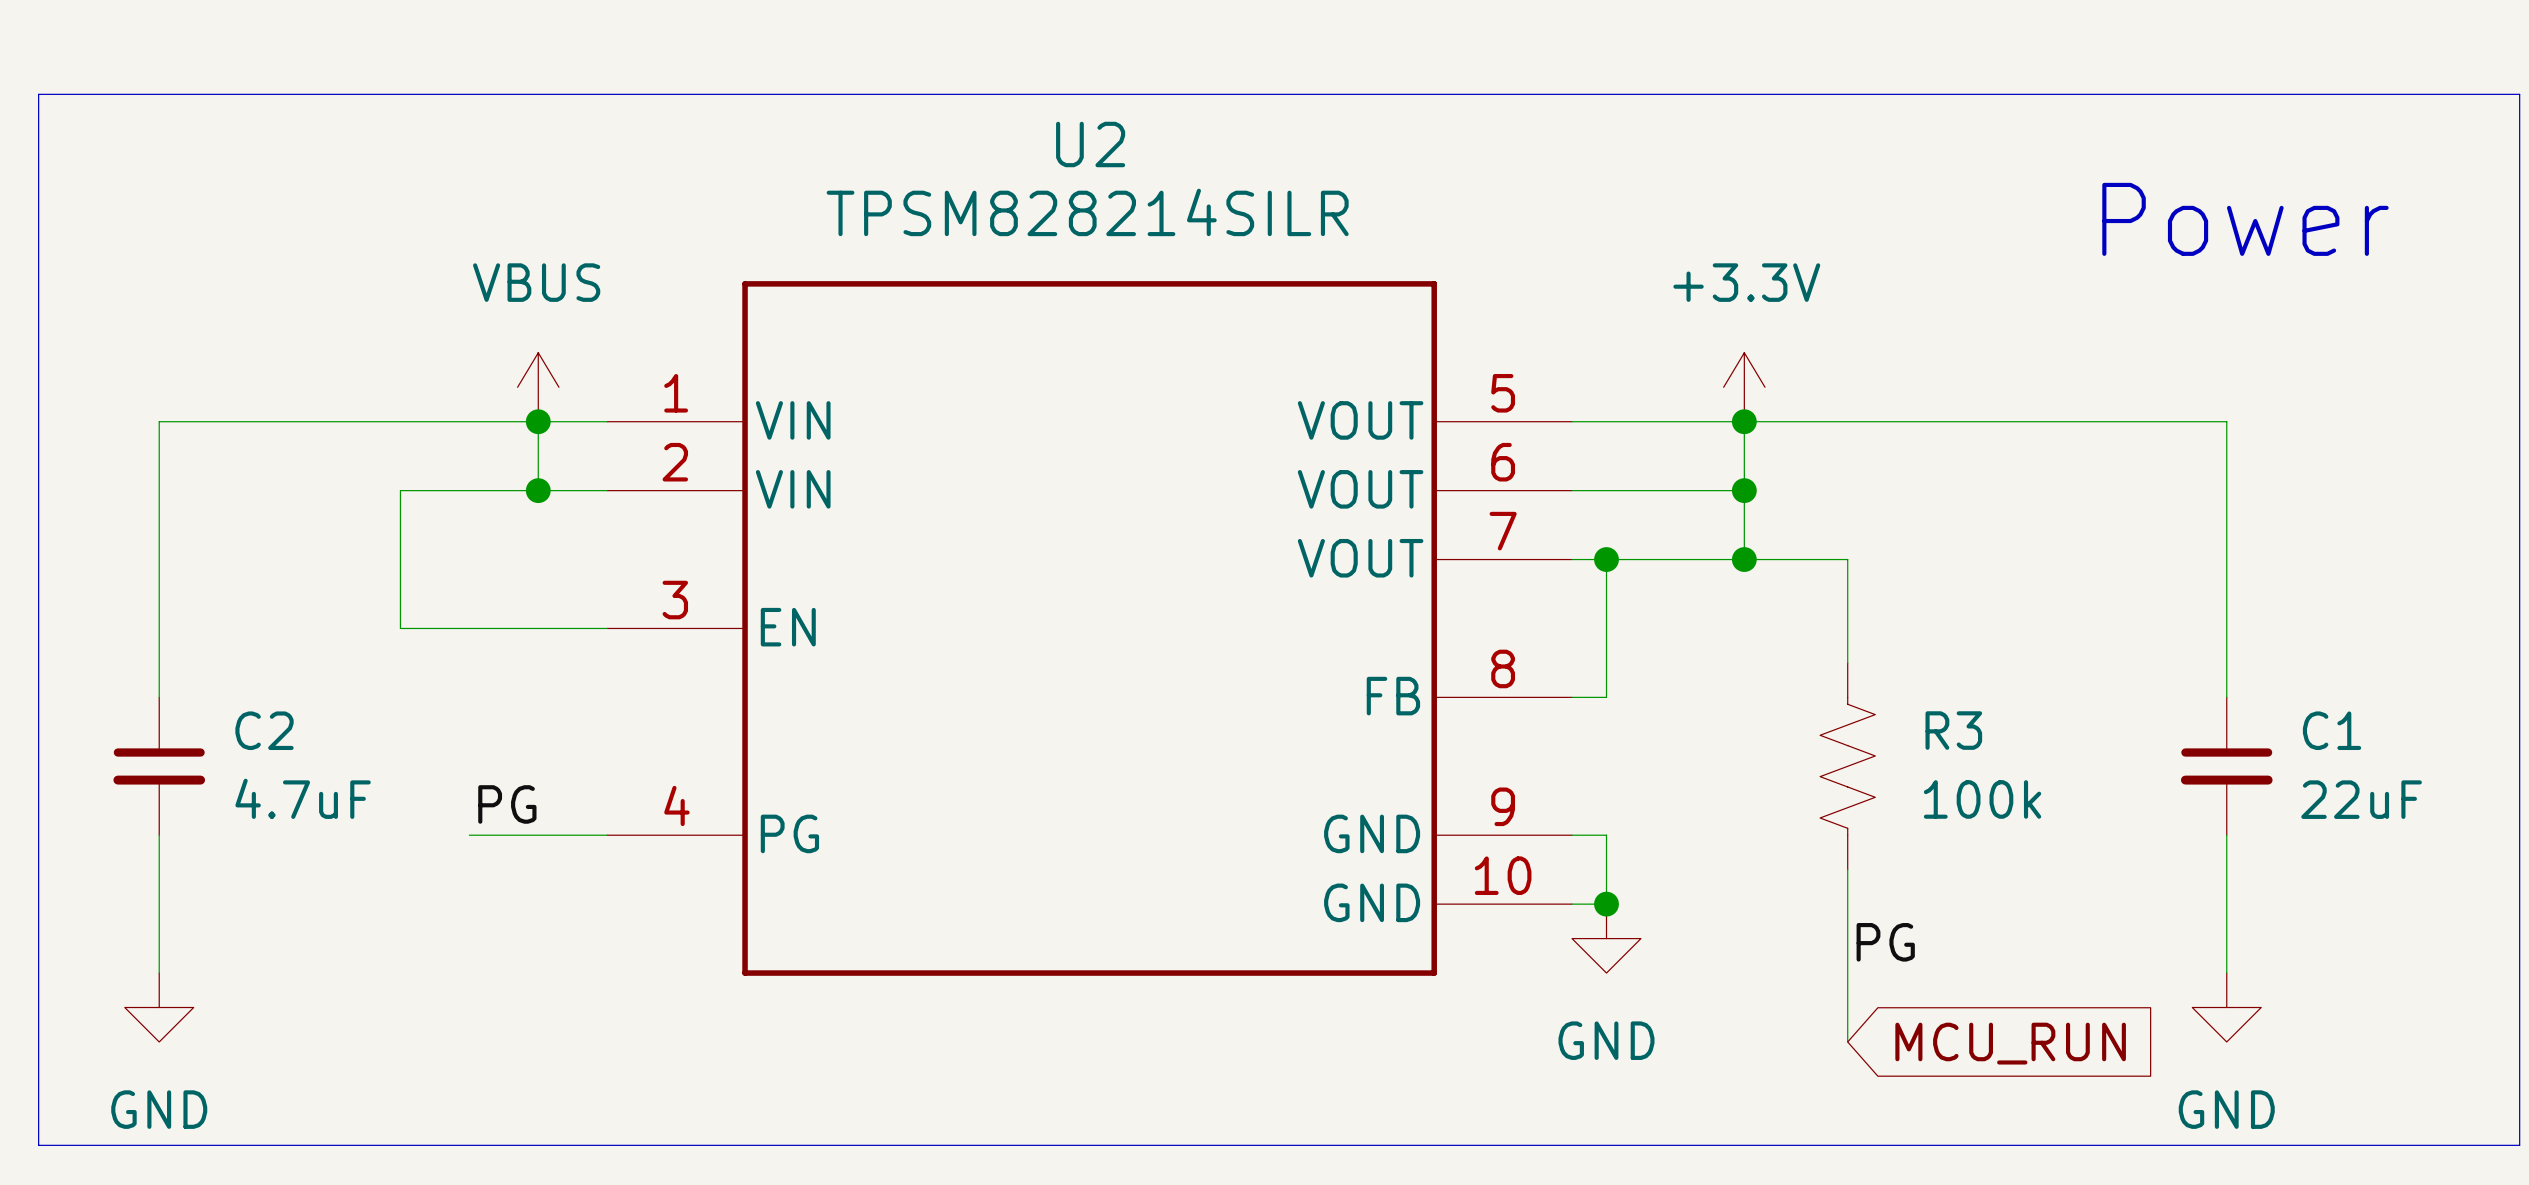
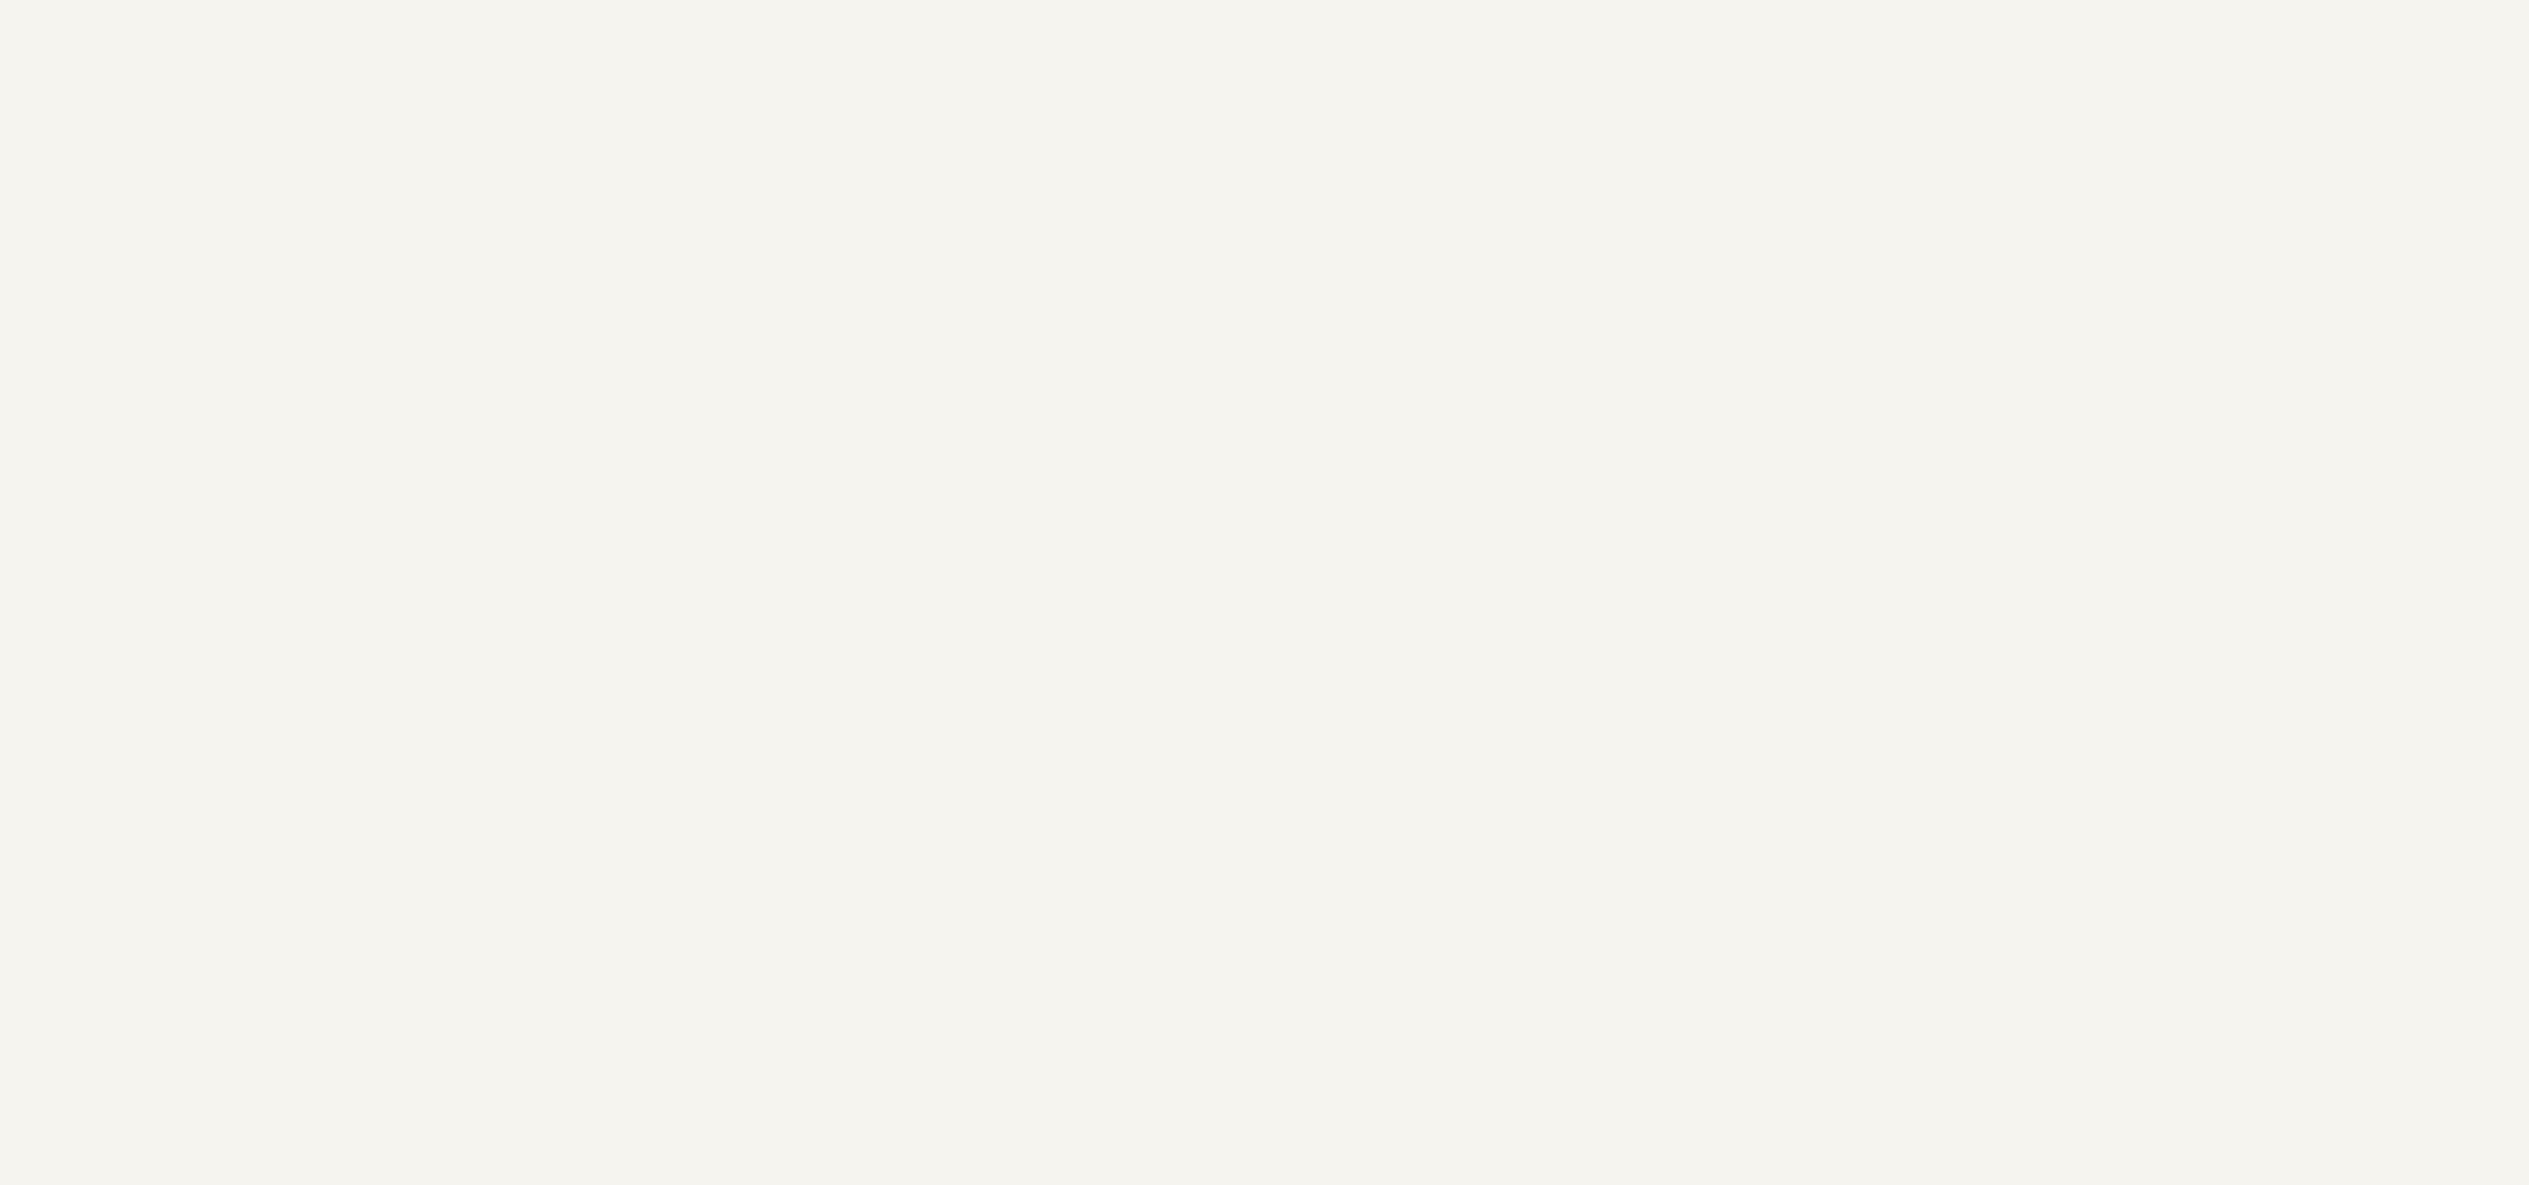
line: (38, 94) (2519, 94) (2519, 1145) (38, 1145) (38, 94) -> none
text: Power (2245, 219) -> none
power symbol: VBUS (538, 387) -> none
power symbol: +3.3V (1744, 387) -> none
wire: (538, 421) (538, 490) -> none
junction: (538, 421) -> none
wire: (607, 421) (159, 421) (159, 697) -> none
wire: (1572, 421) (2226, 421) (2226, 697) -> none
wire: (1744, 421) (1744, 559) -> none
junction: (1744, 421) -> none
junction: (538, 490) -> none
wire: (607, 490) (400, 490) (400, 628) (607, 628) -> none
wire: (1572, 490) (1744, 490) -> none
junction: (1744, 490) -> none
wire: (1572, 559) (1847, 559) (1847, 662) -> none
wire: (1606, 559) (1606, 697) (1572, 697) -> none
junction: (1606, 559) -> none
junction: (1744, 559) -> none
U2: TPSM828214SILR (1089, 628) -> none
C2: 4.7uF (159, 766) -> none
R3: 100k (1847, 766) -> none
C1: 22uF (2226, 766) -> none
label: PG (507, 804) -> none
wire: (159, 835) (159, 973) -> none
wire: (469, 835) (607, 835) -> none
wire: (1572, 835) (1606, 835) (1606, 904) (1572, 904) -> none
wire: (2226, 835) (2226, 973) -> none
wire: (1847, 869) (1847, 1041) -> none
junction: (1606, 904) -> none
power symbol: GND (1606, 938) -> none
label: PG (1885, 942) -> none
power symbol: GND (159, 1007) -> none
power symbol: GND (2226, 1007) -> none
global label: MCU_RUN (2010, 1043) -> none

